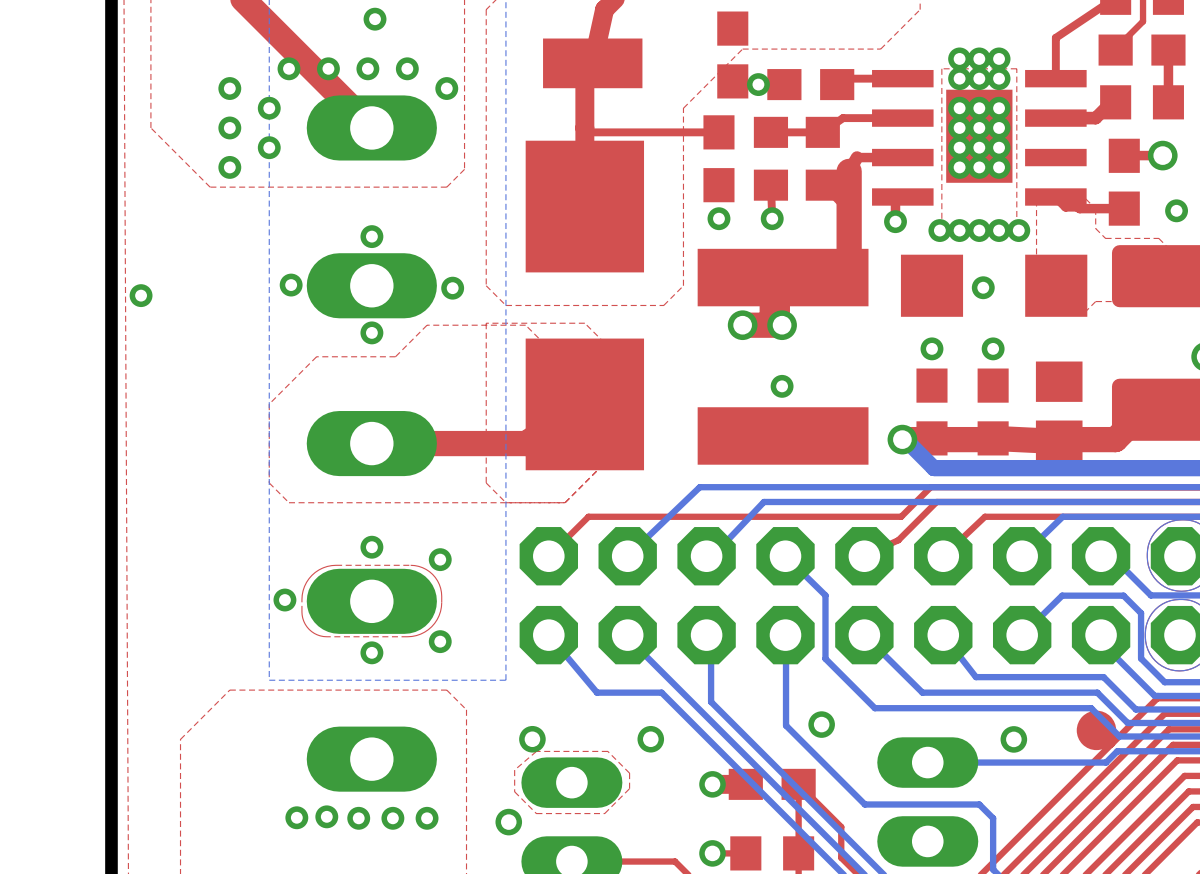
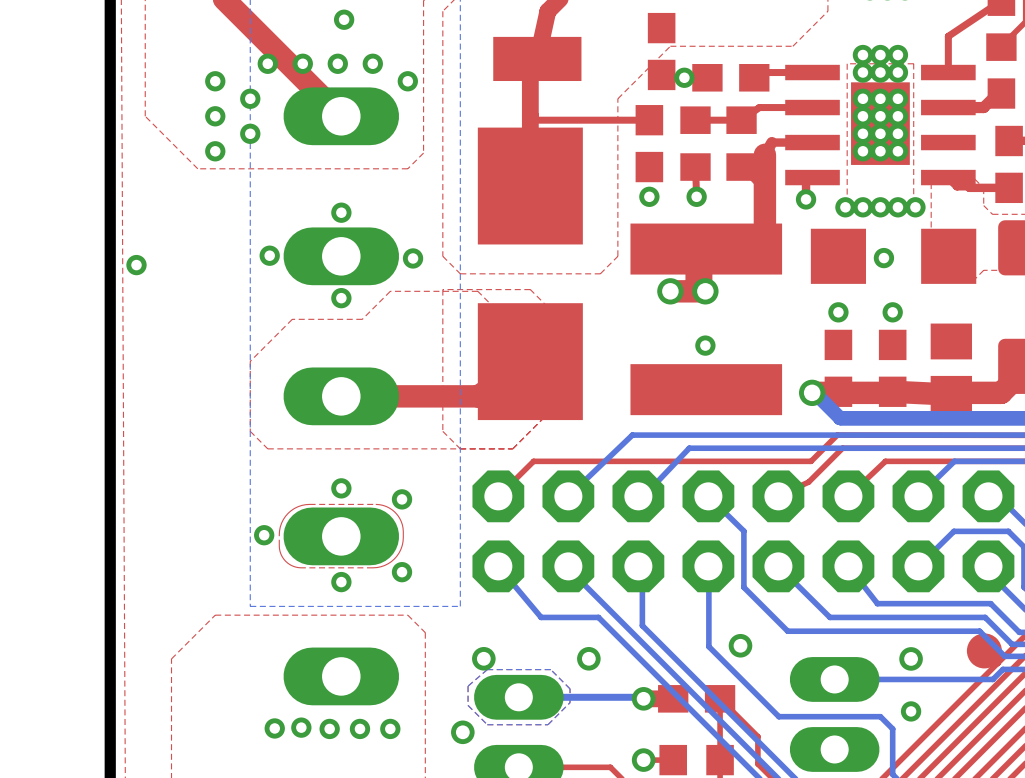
bottom zone outline: none -> (550, 669) (570, 688) (570, 702) (547, 724) (487, 724) (468, 705) (468, 686) (487, 669) (550, 669)
bottom track: none -> (518, 697) (642, 697) (643, 698)
via: none -> (911, 711)

